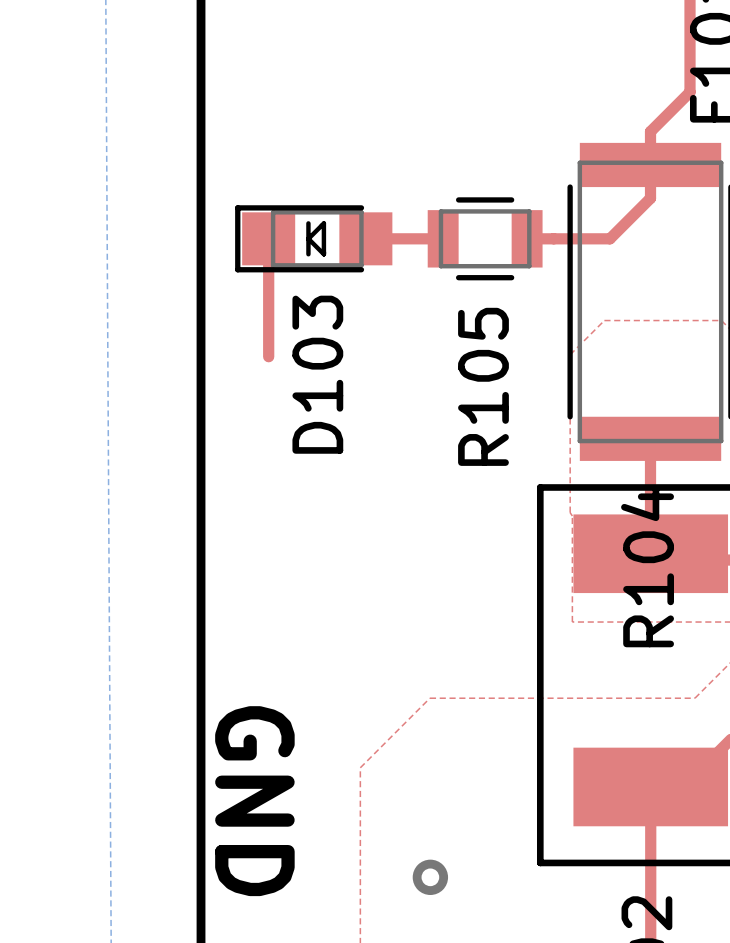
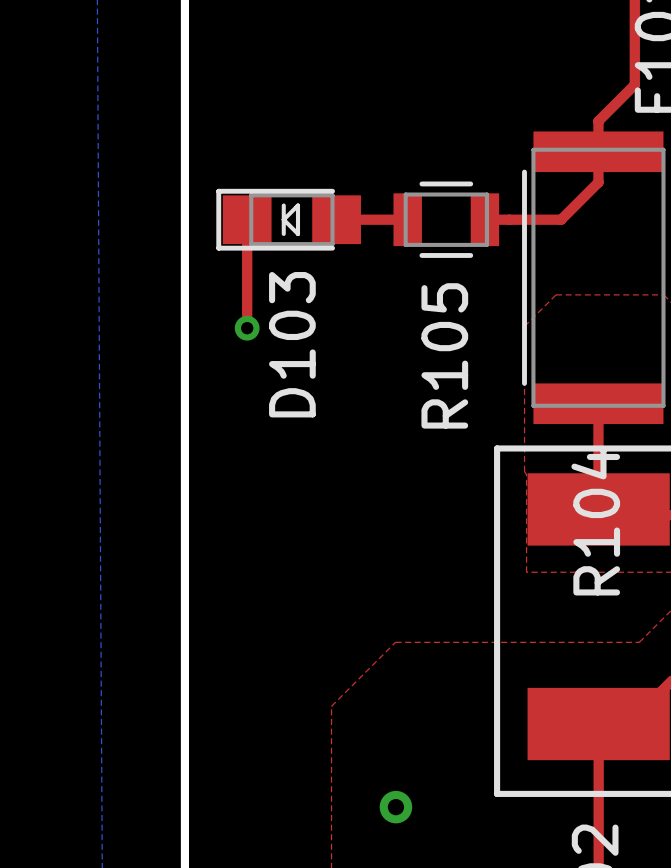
via: none -> (247, 328)
text: GND (254, 801) -> none

